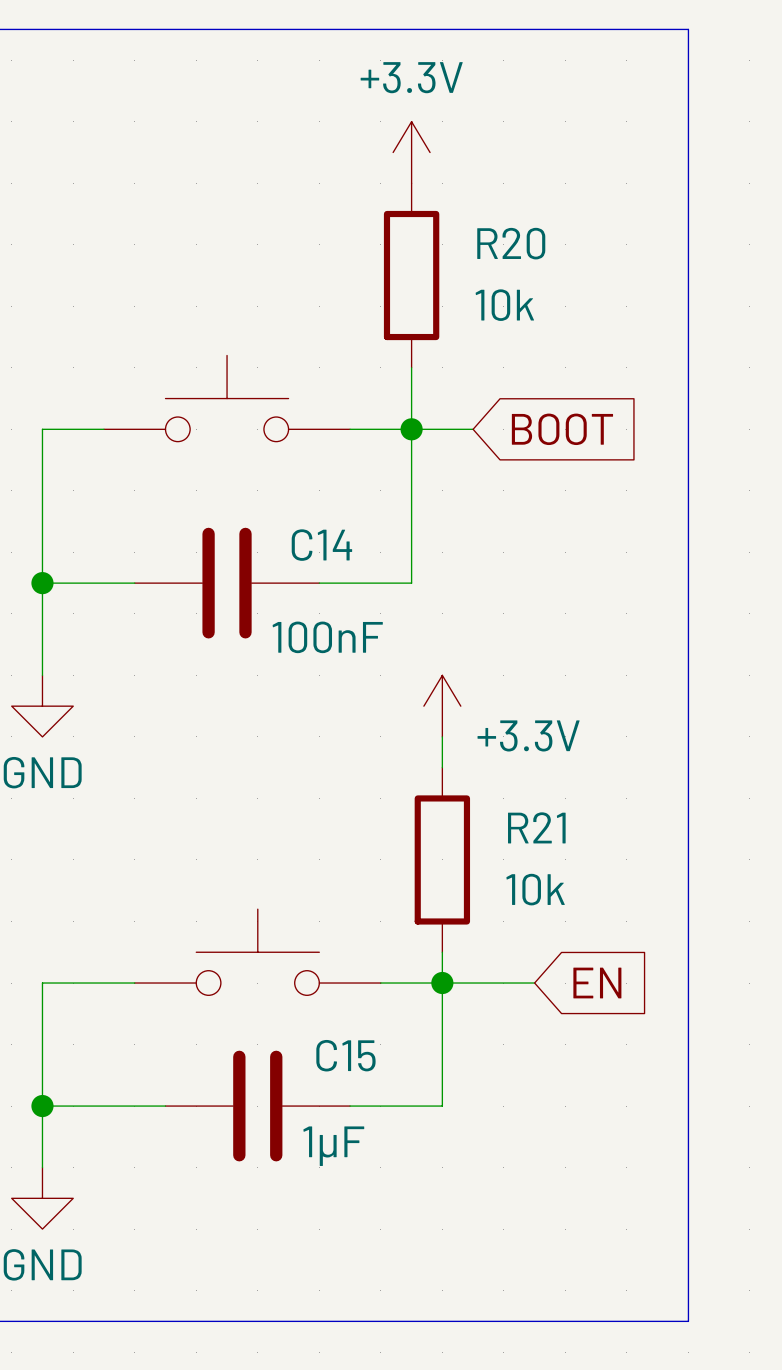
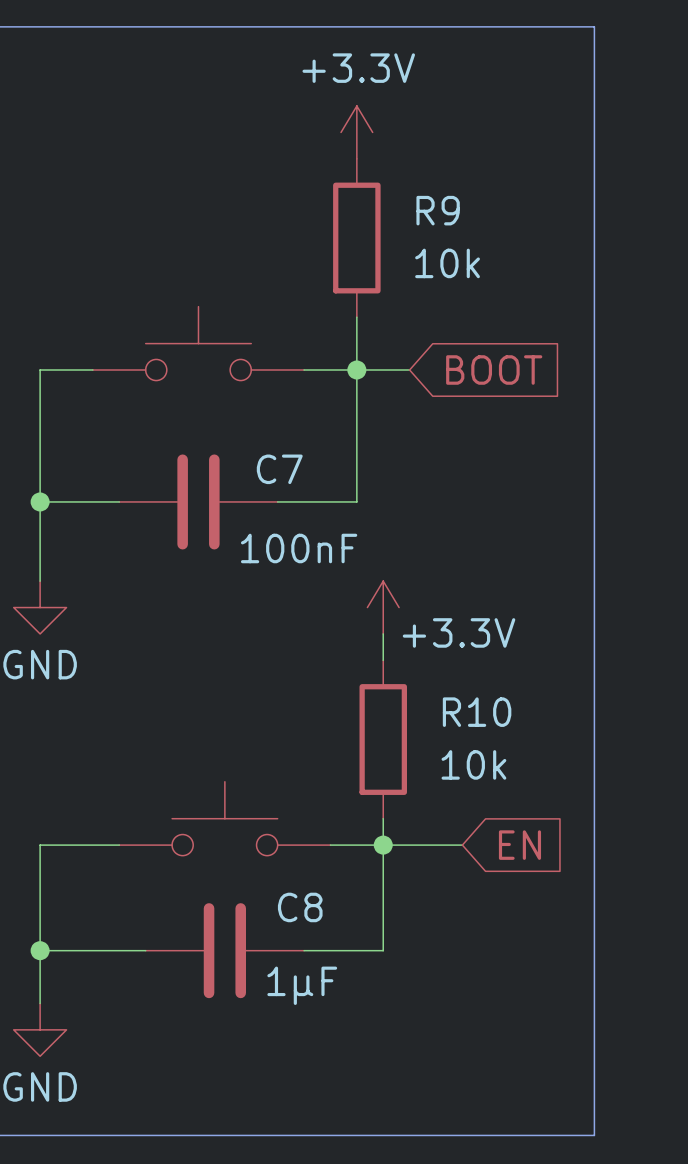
R20 name: R20 (511, 243) -> R9 (438, 210)
C14 name: C14 (321, 545) -> C7 (279, 469)
R21 name: R21 (536, 827) -> R10 (477, 712)
C15 name: C15 (345, 1055) -> C8 (300, 907)

